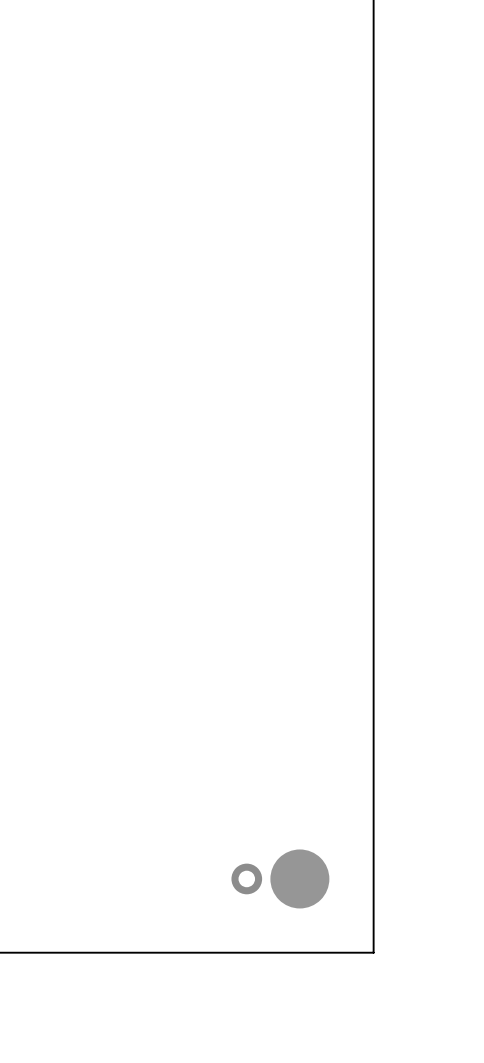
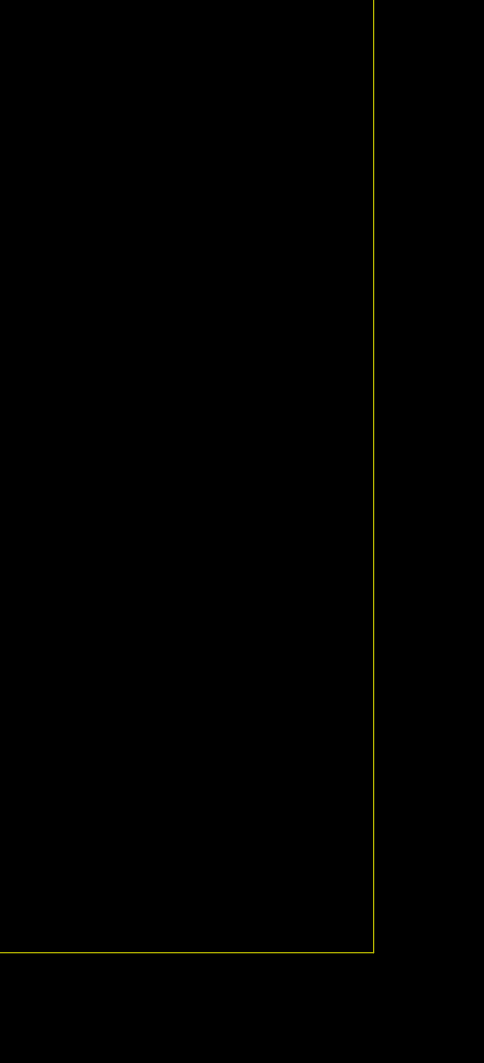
via: (246, 878) -> none
part: (299, 878) -> none

